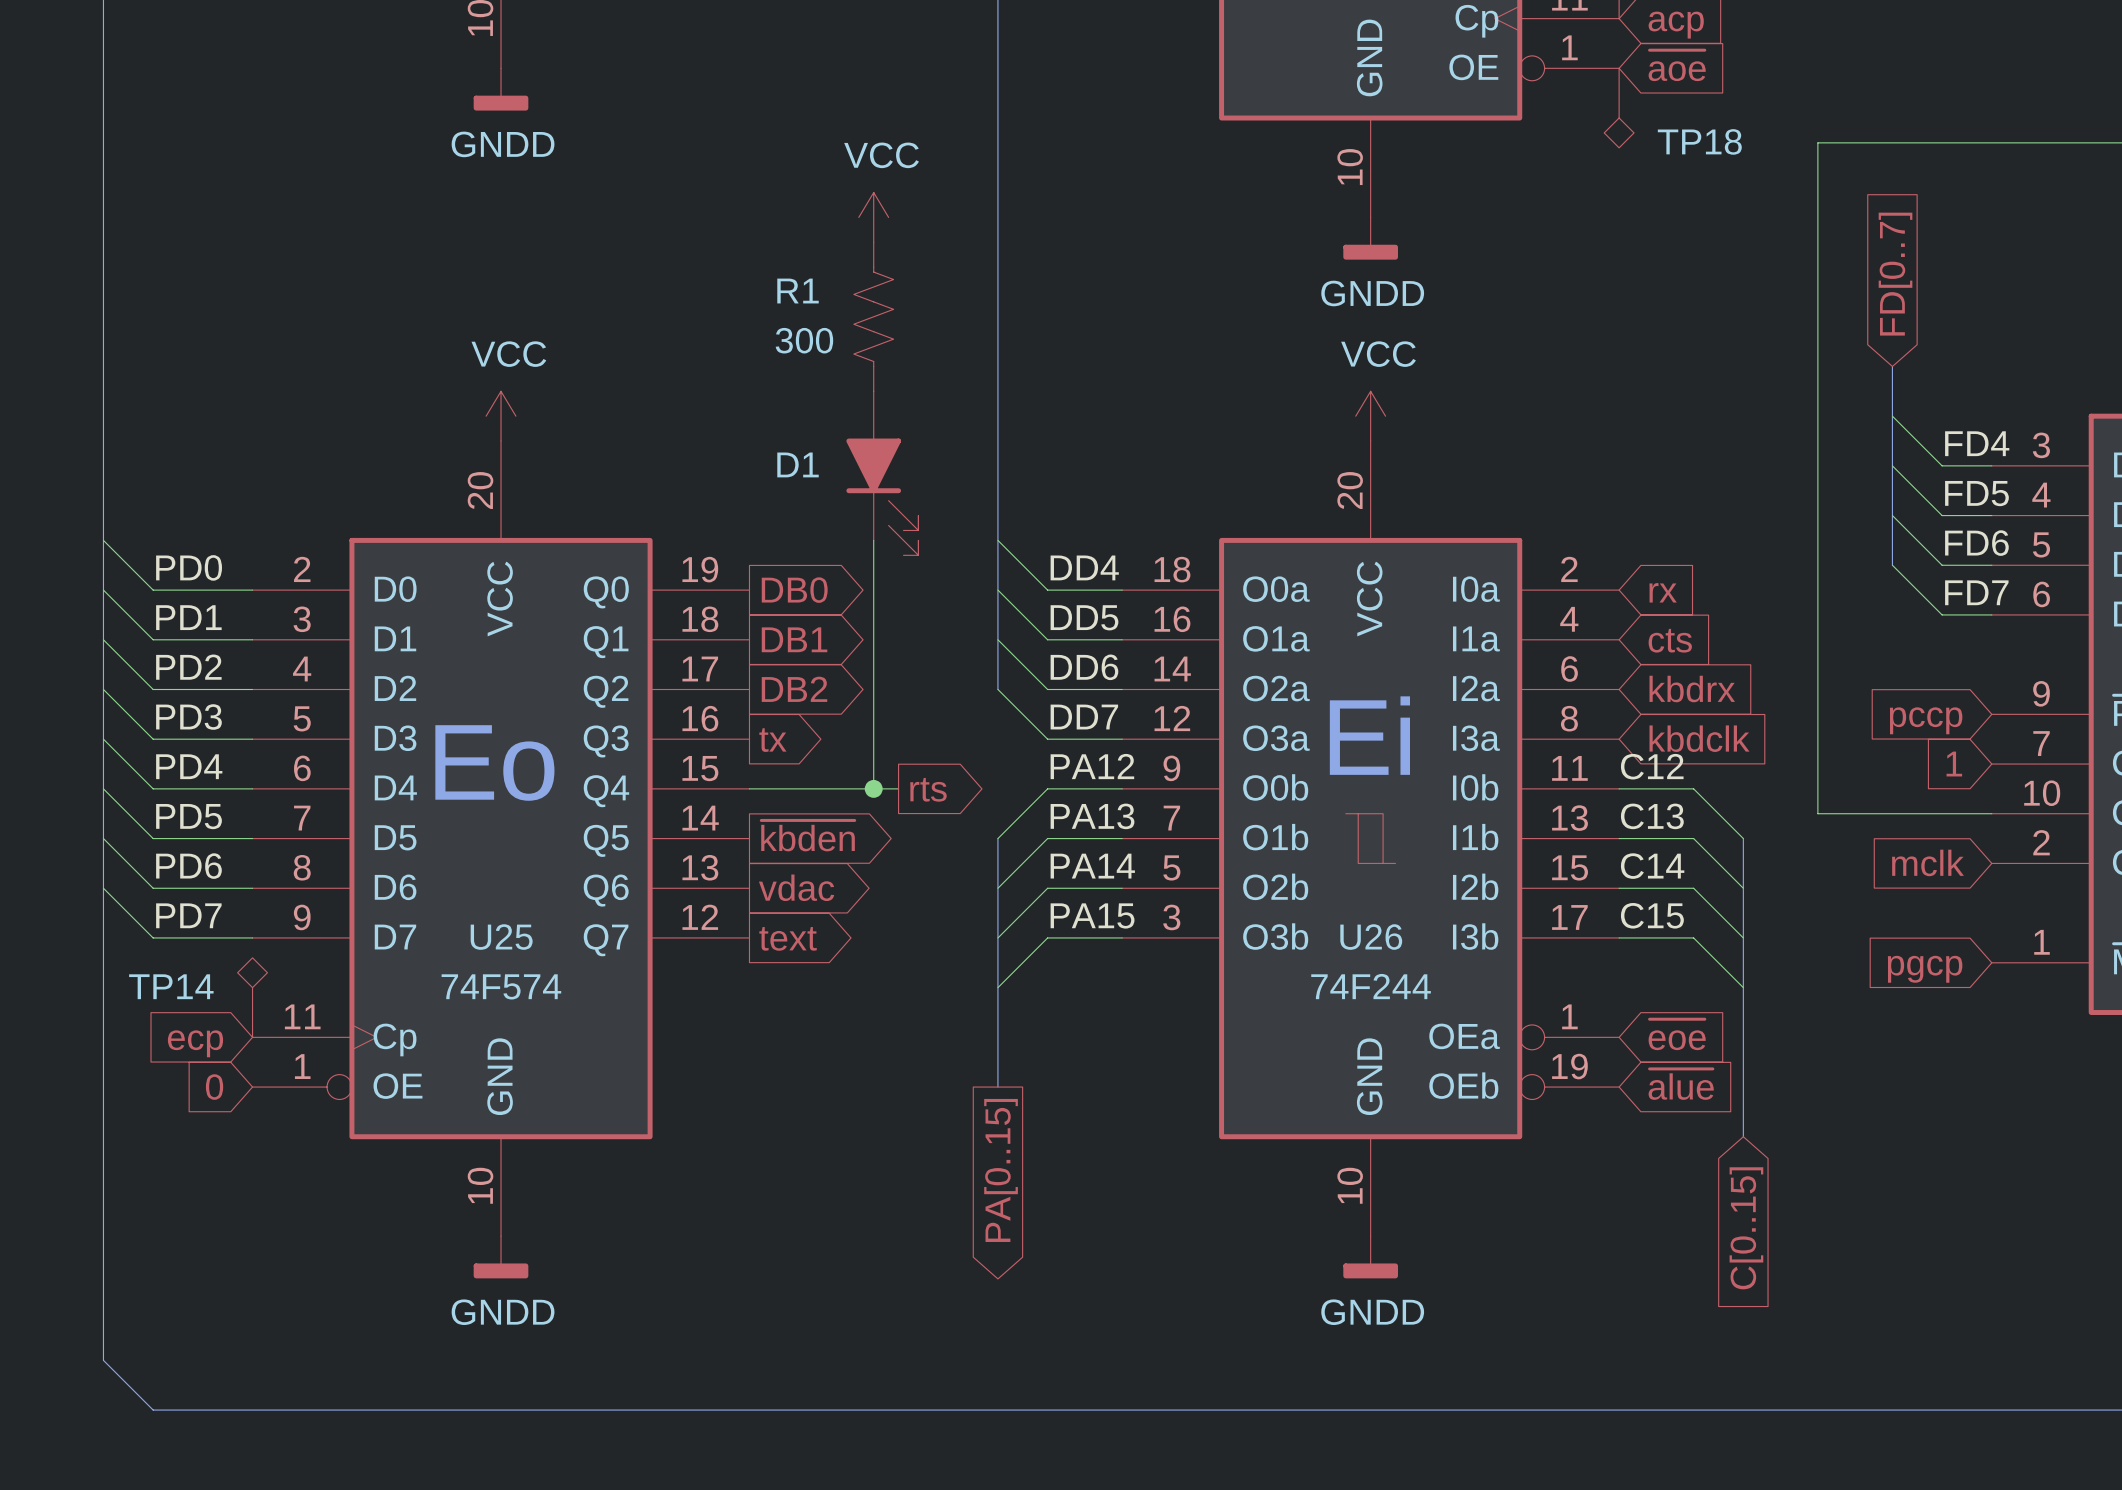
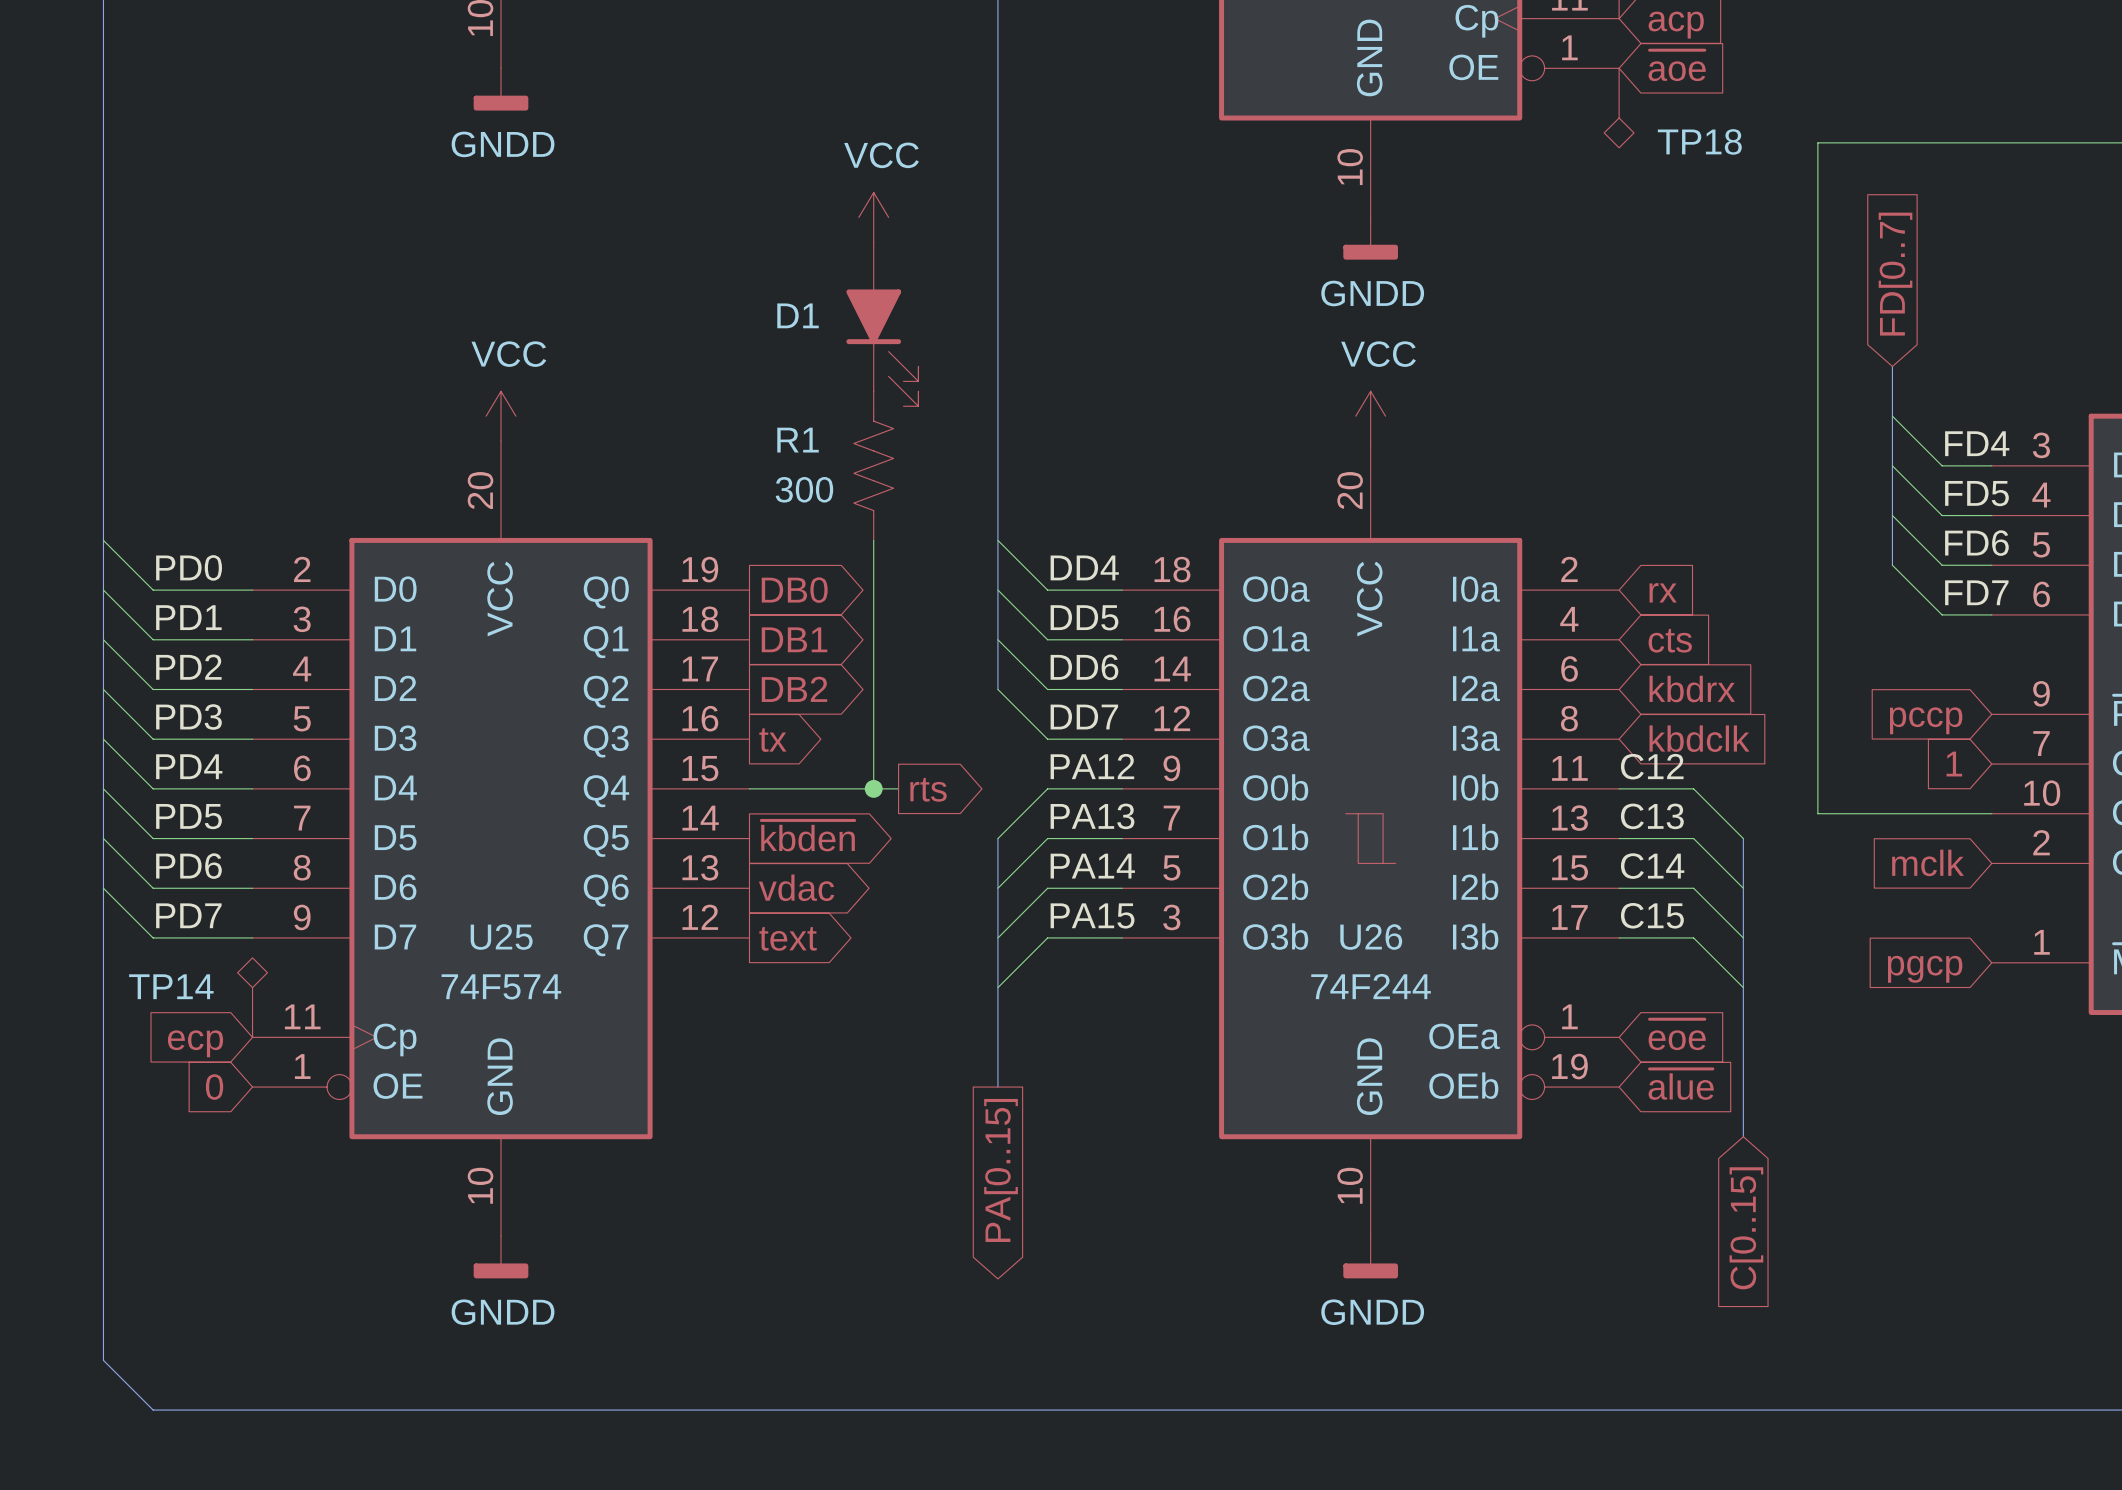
R1 position: (873, 316) -> (873, 465)
D1 position: (882, 473) -> (882, 324)
text: Ei (1369, 735) -> none
text: Eo (494, 762) -> none

